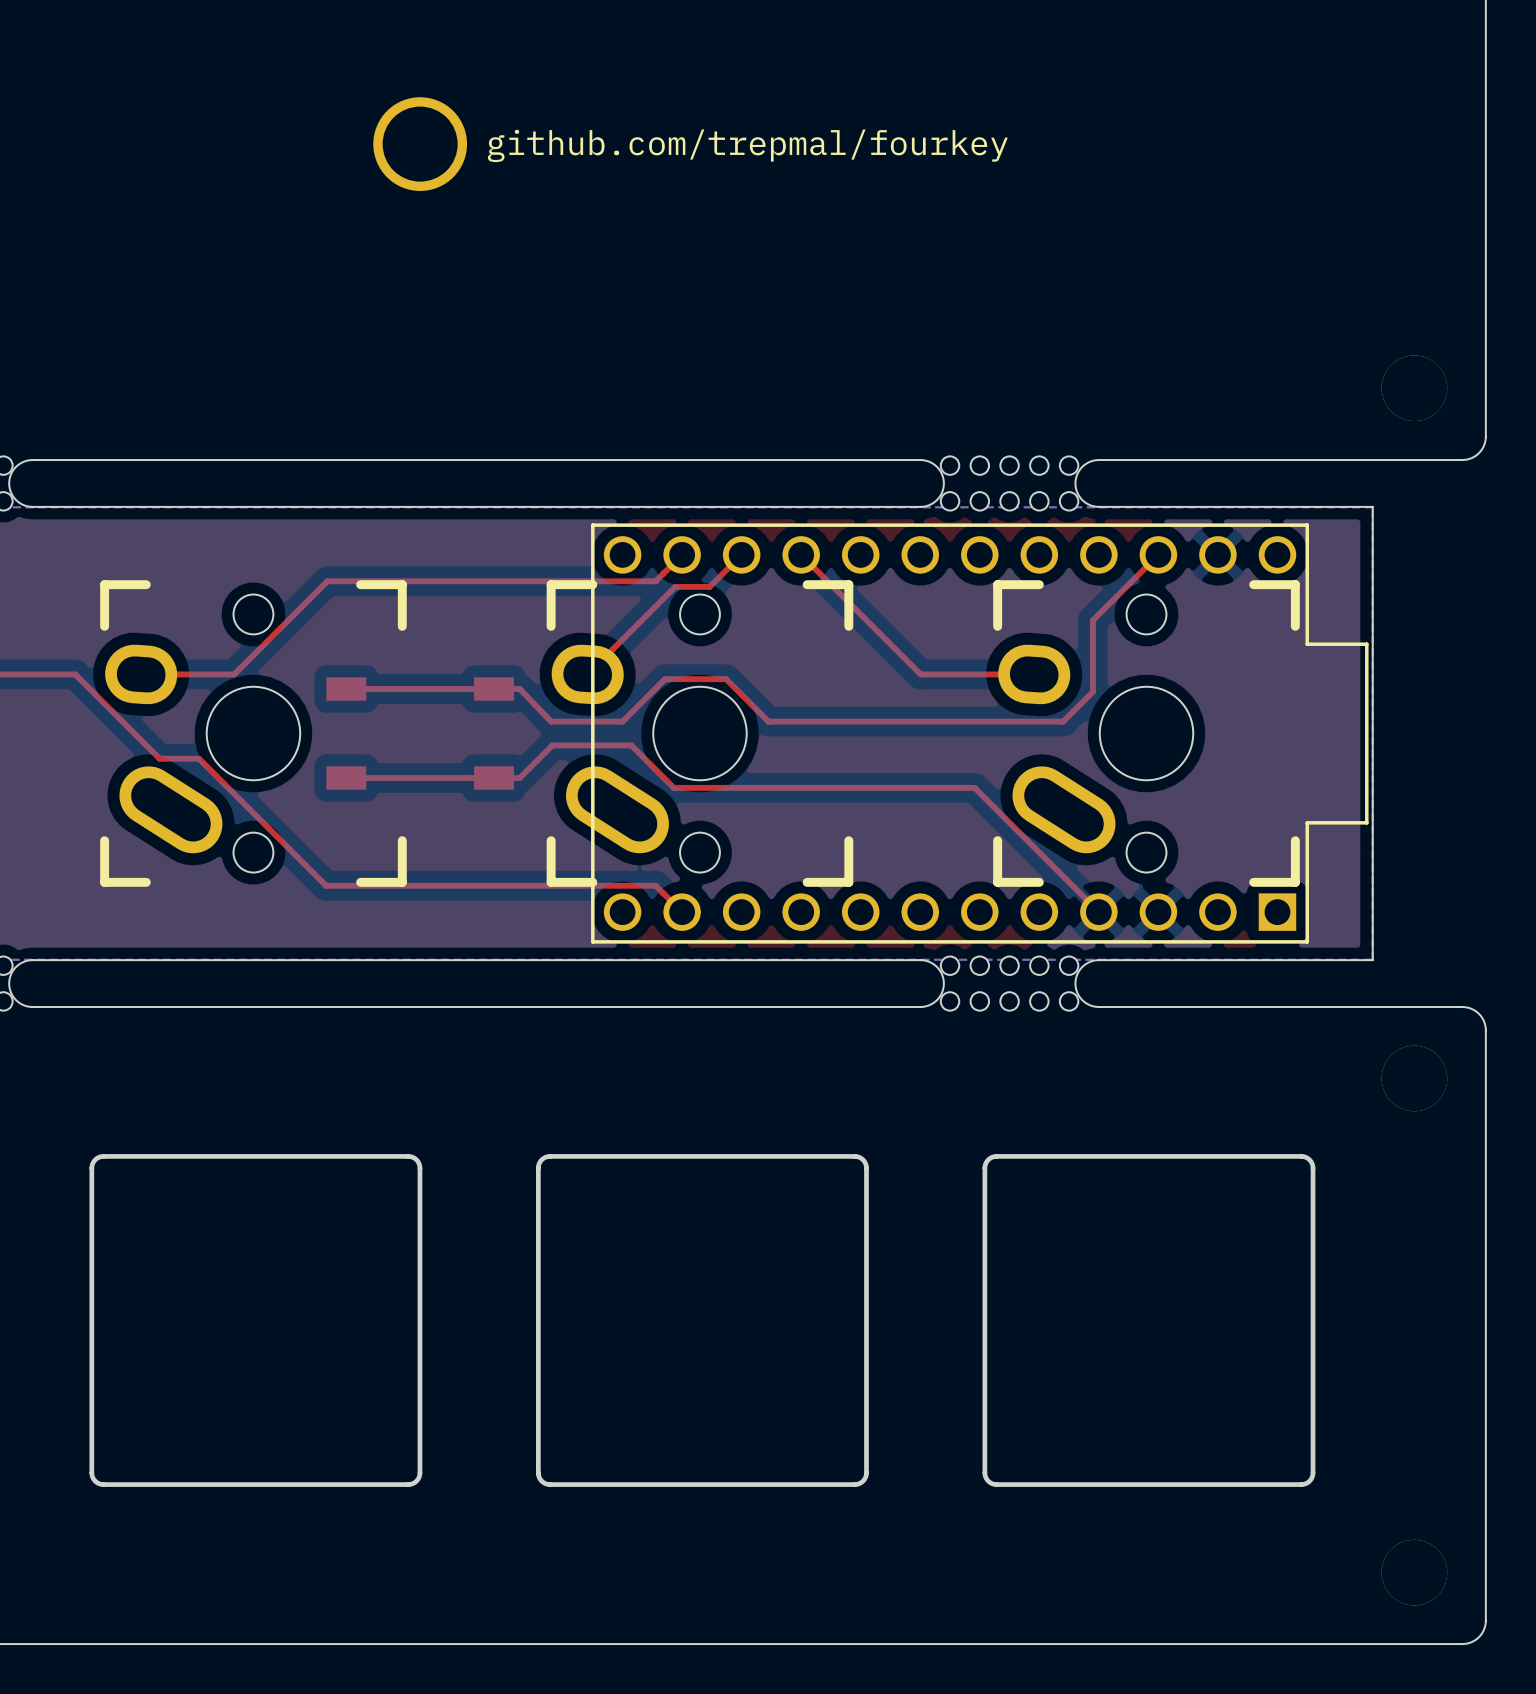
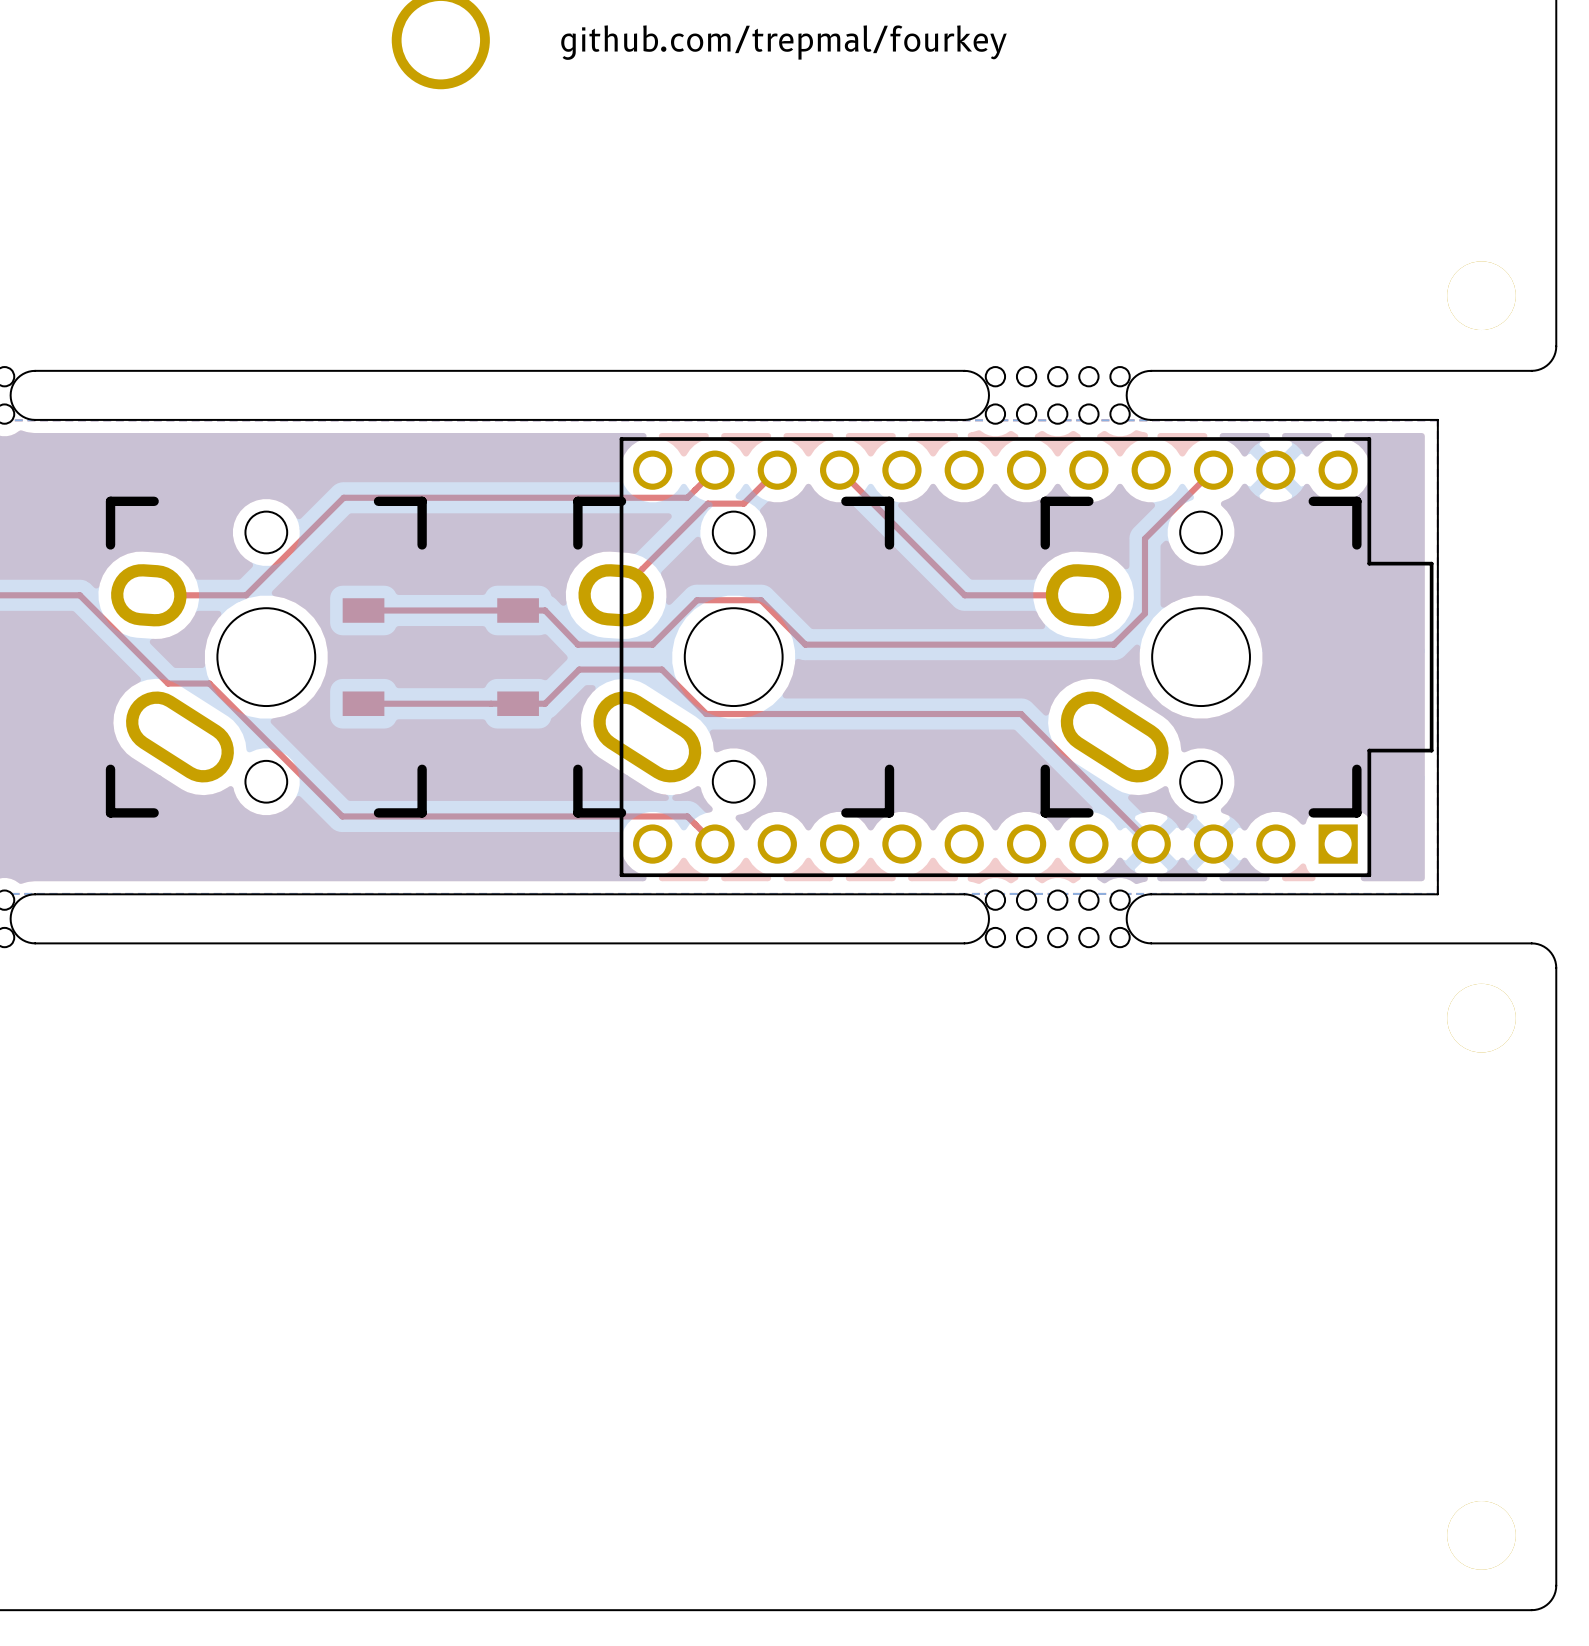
board edge: (408, 1156) (103, 1156) (95, 1159) (91, 1168) (91, 1472) (95, 1481) (103, 1484) (408, 1484) (416, 1481) (419, 1472) (419, 1168) (416, 1159) (408, 1156) -> none
board edge: (854, 1156) (550, 1156) (541, 1159) (538, 1168) (538, 1472) (541, 1481) (550, 1484) (854, 1484) (863, 1481) (866, 1472) (866, 1168) (863, 1159) (854, 1156) -> none
board edge: (1301, 1156) (996, 1156) (988, 1159) (984, 1168) (984, 1472) (988, 1481) (996, 1484) (1301, 1484) (1309, 1481) (1313, 1472) (1313, 1168) (1309, 1159) (1301, 1156) -> none

